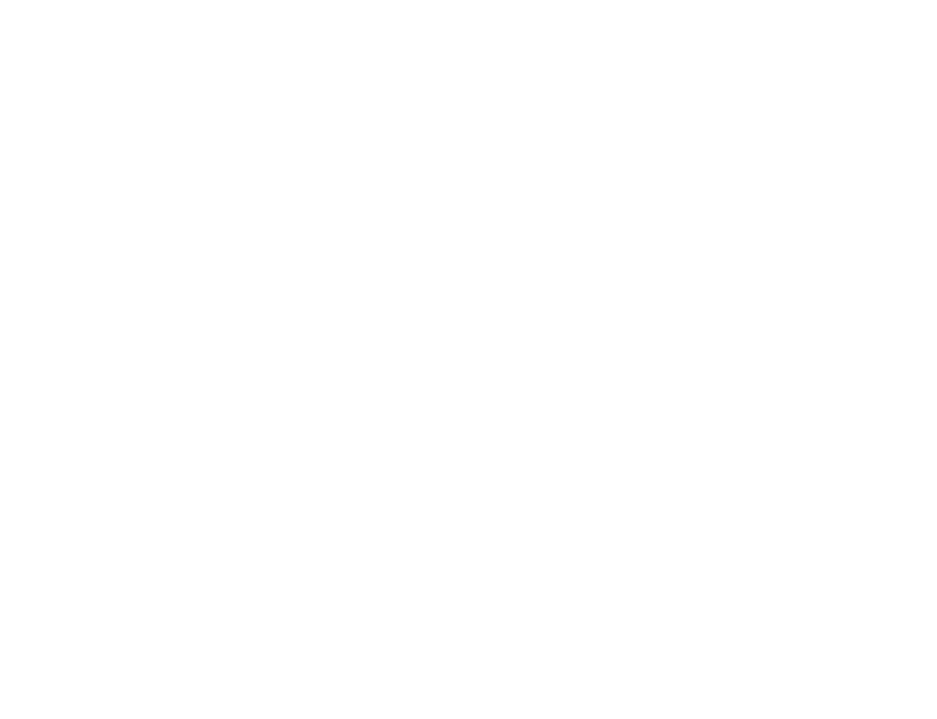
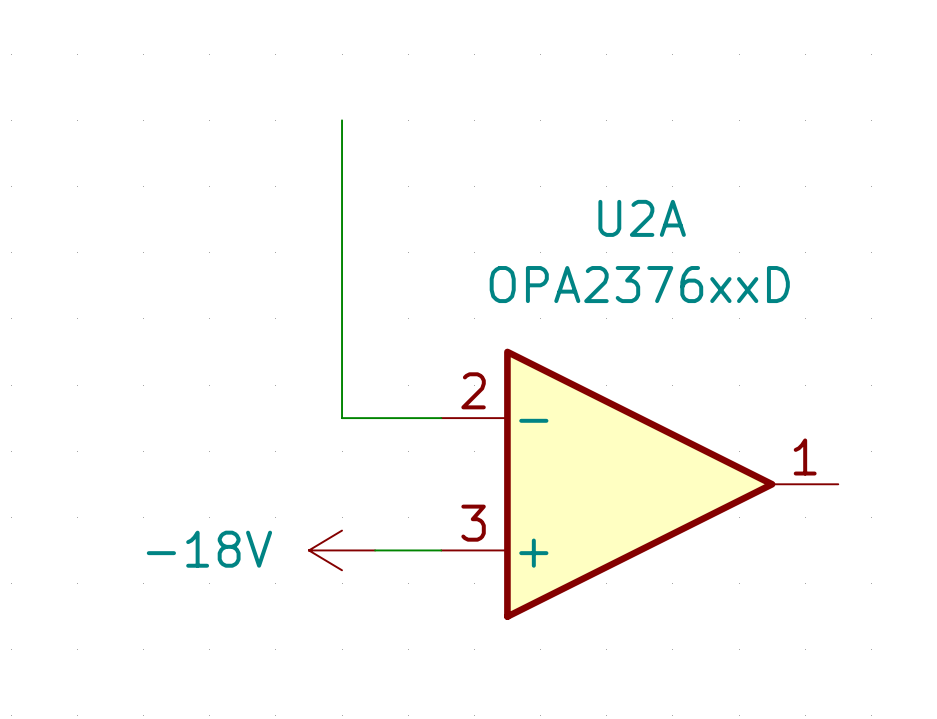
wire: none -> (342, 120) (342, 418) (441, 418)
U2A: none -> OPA2376xxD (639, 484)
power symbol: none -> -18V (342, 550)
wire: none -> (375, 550) (441, 550)

